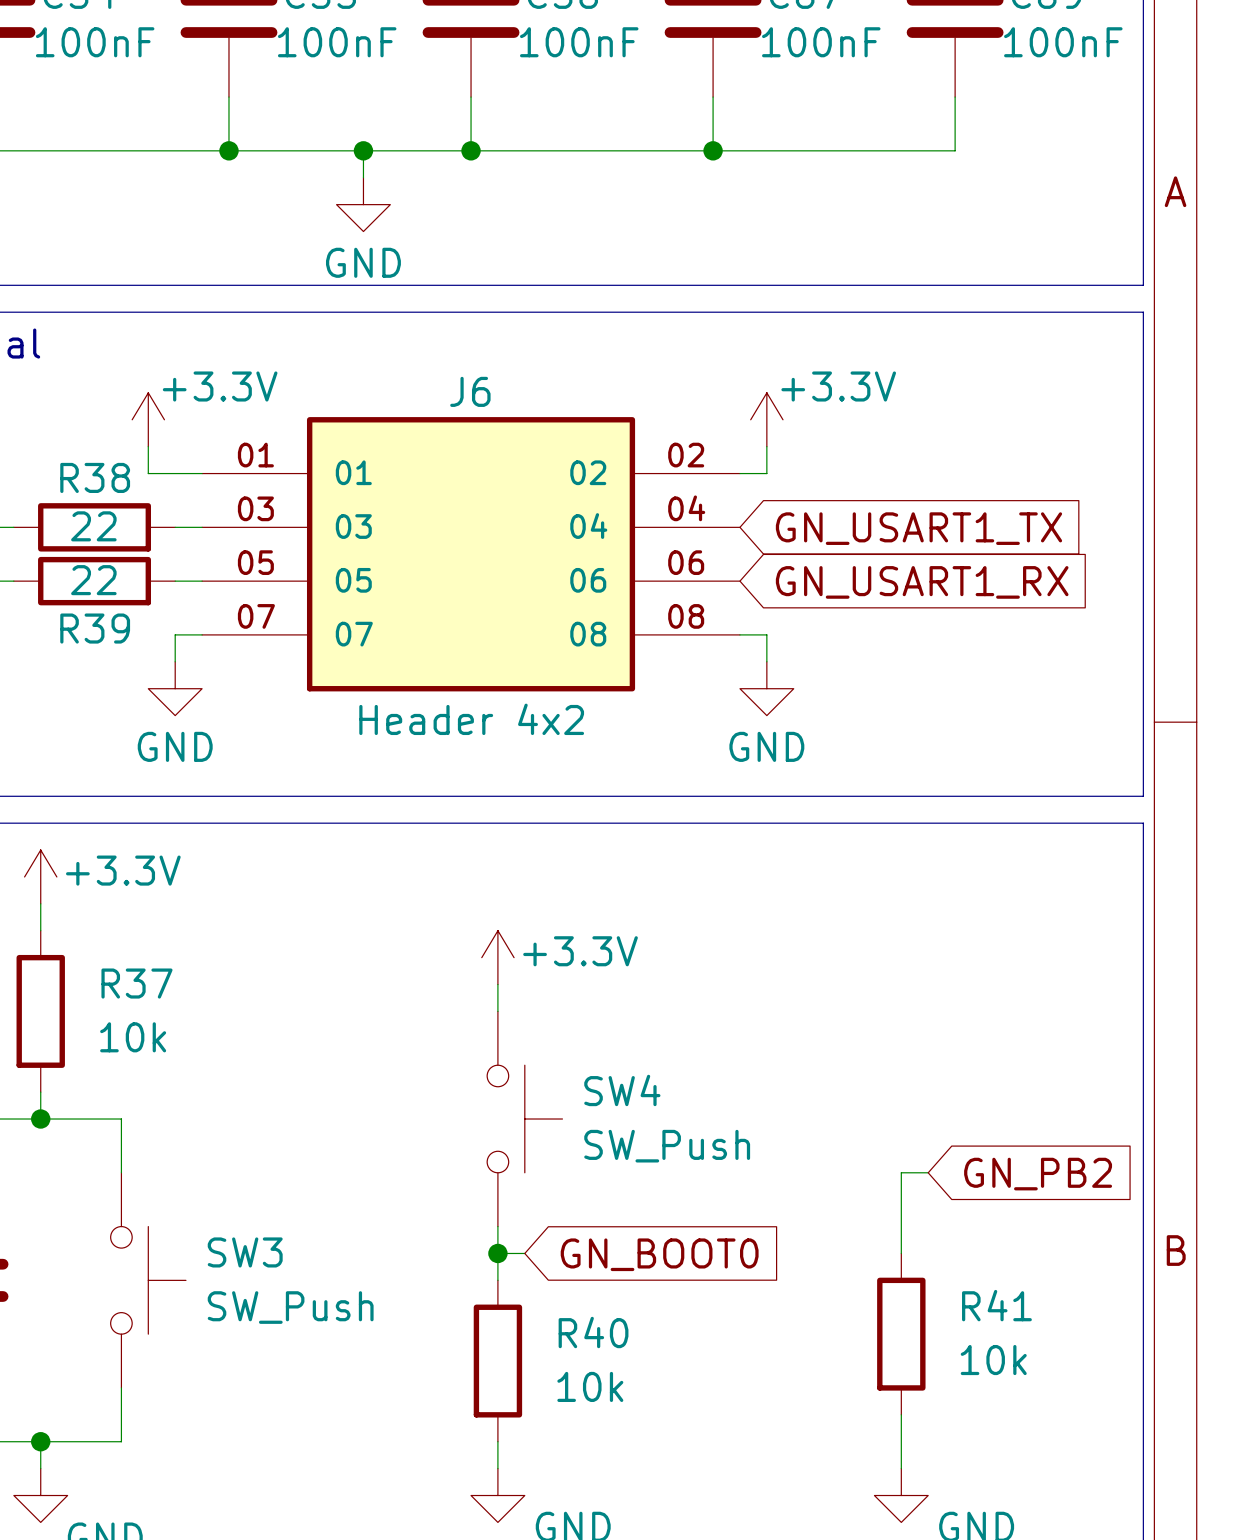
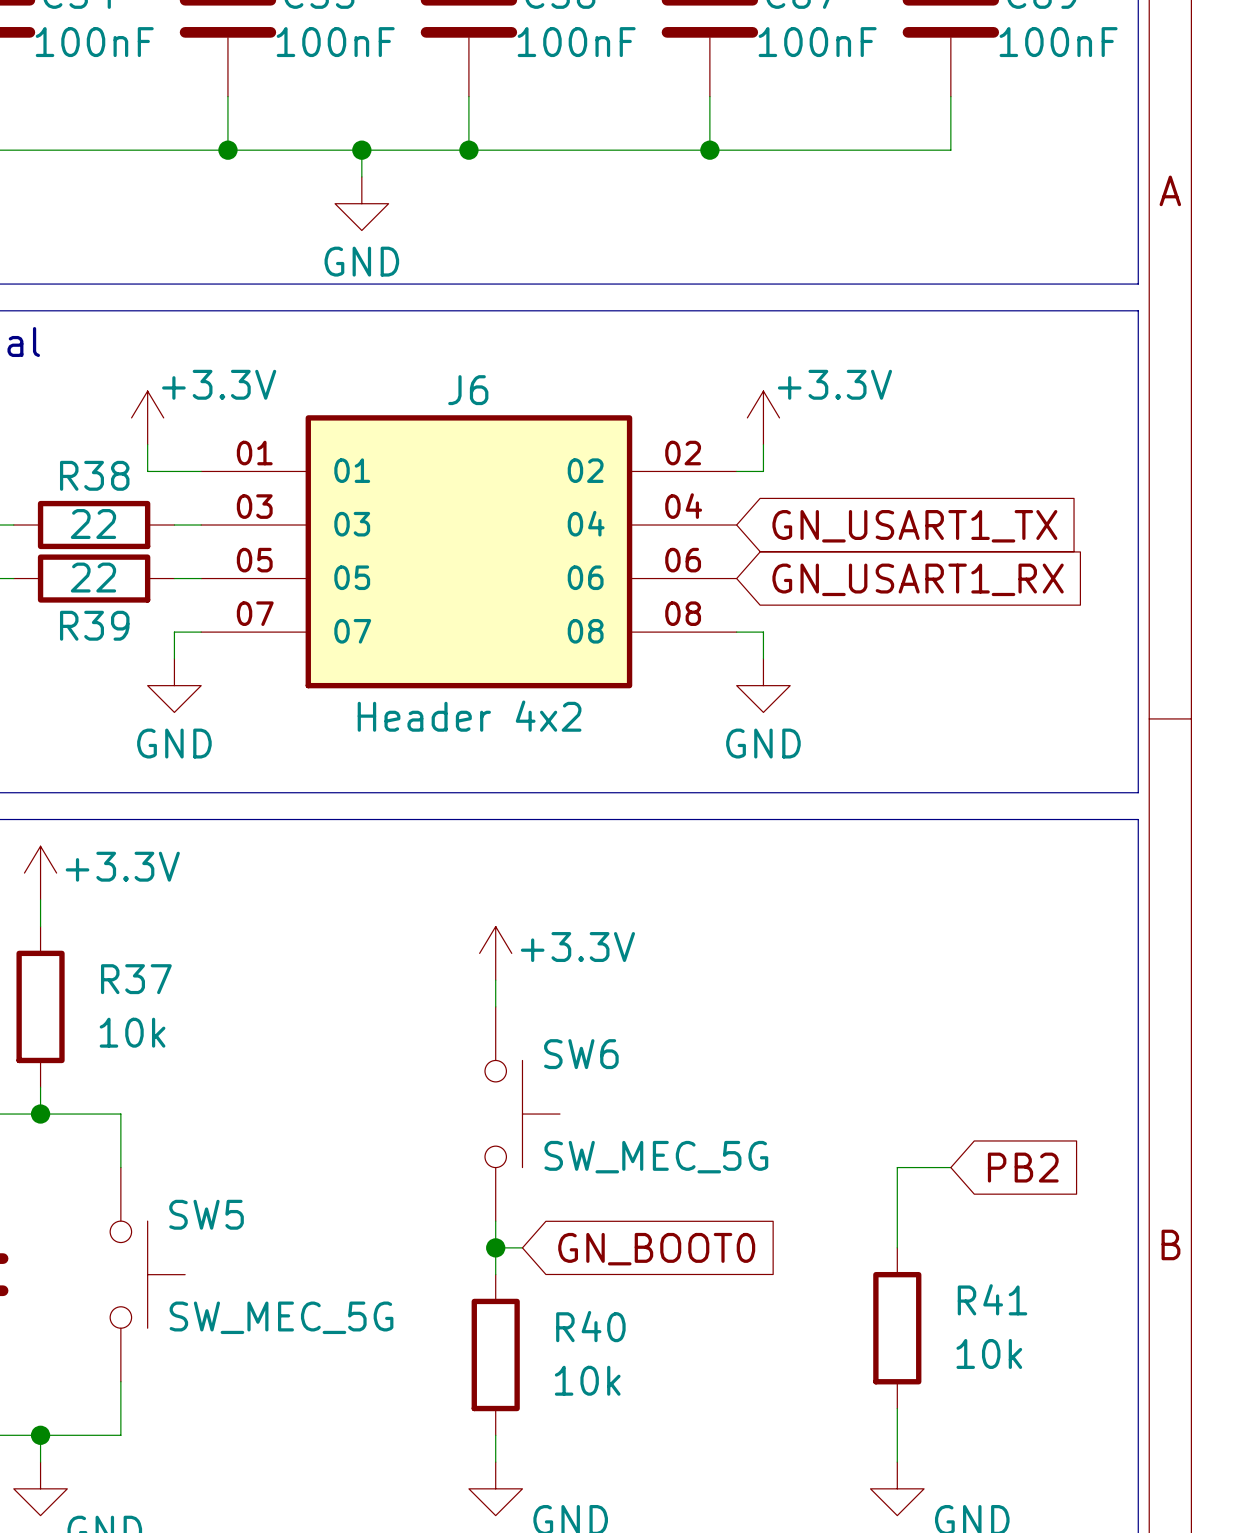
SW4 name: SW4 (622, 1090) -> SW6 (581, 1054)
SW4 value: SW_Push (667, 1146) -> SW_MEC_5G (656, 1157)
wire: none -> (924, 1167) (950, 1167)
global label: GN_PB2 (1038, 1174) -> PB2 (1023, 1167)
SW3 name: SW3 (245, 1252) -> SW5 (206, 1214)
SW3 value: SW_Push (290, 1307) -> SW_MEC_5G (281, 1317)

